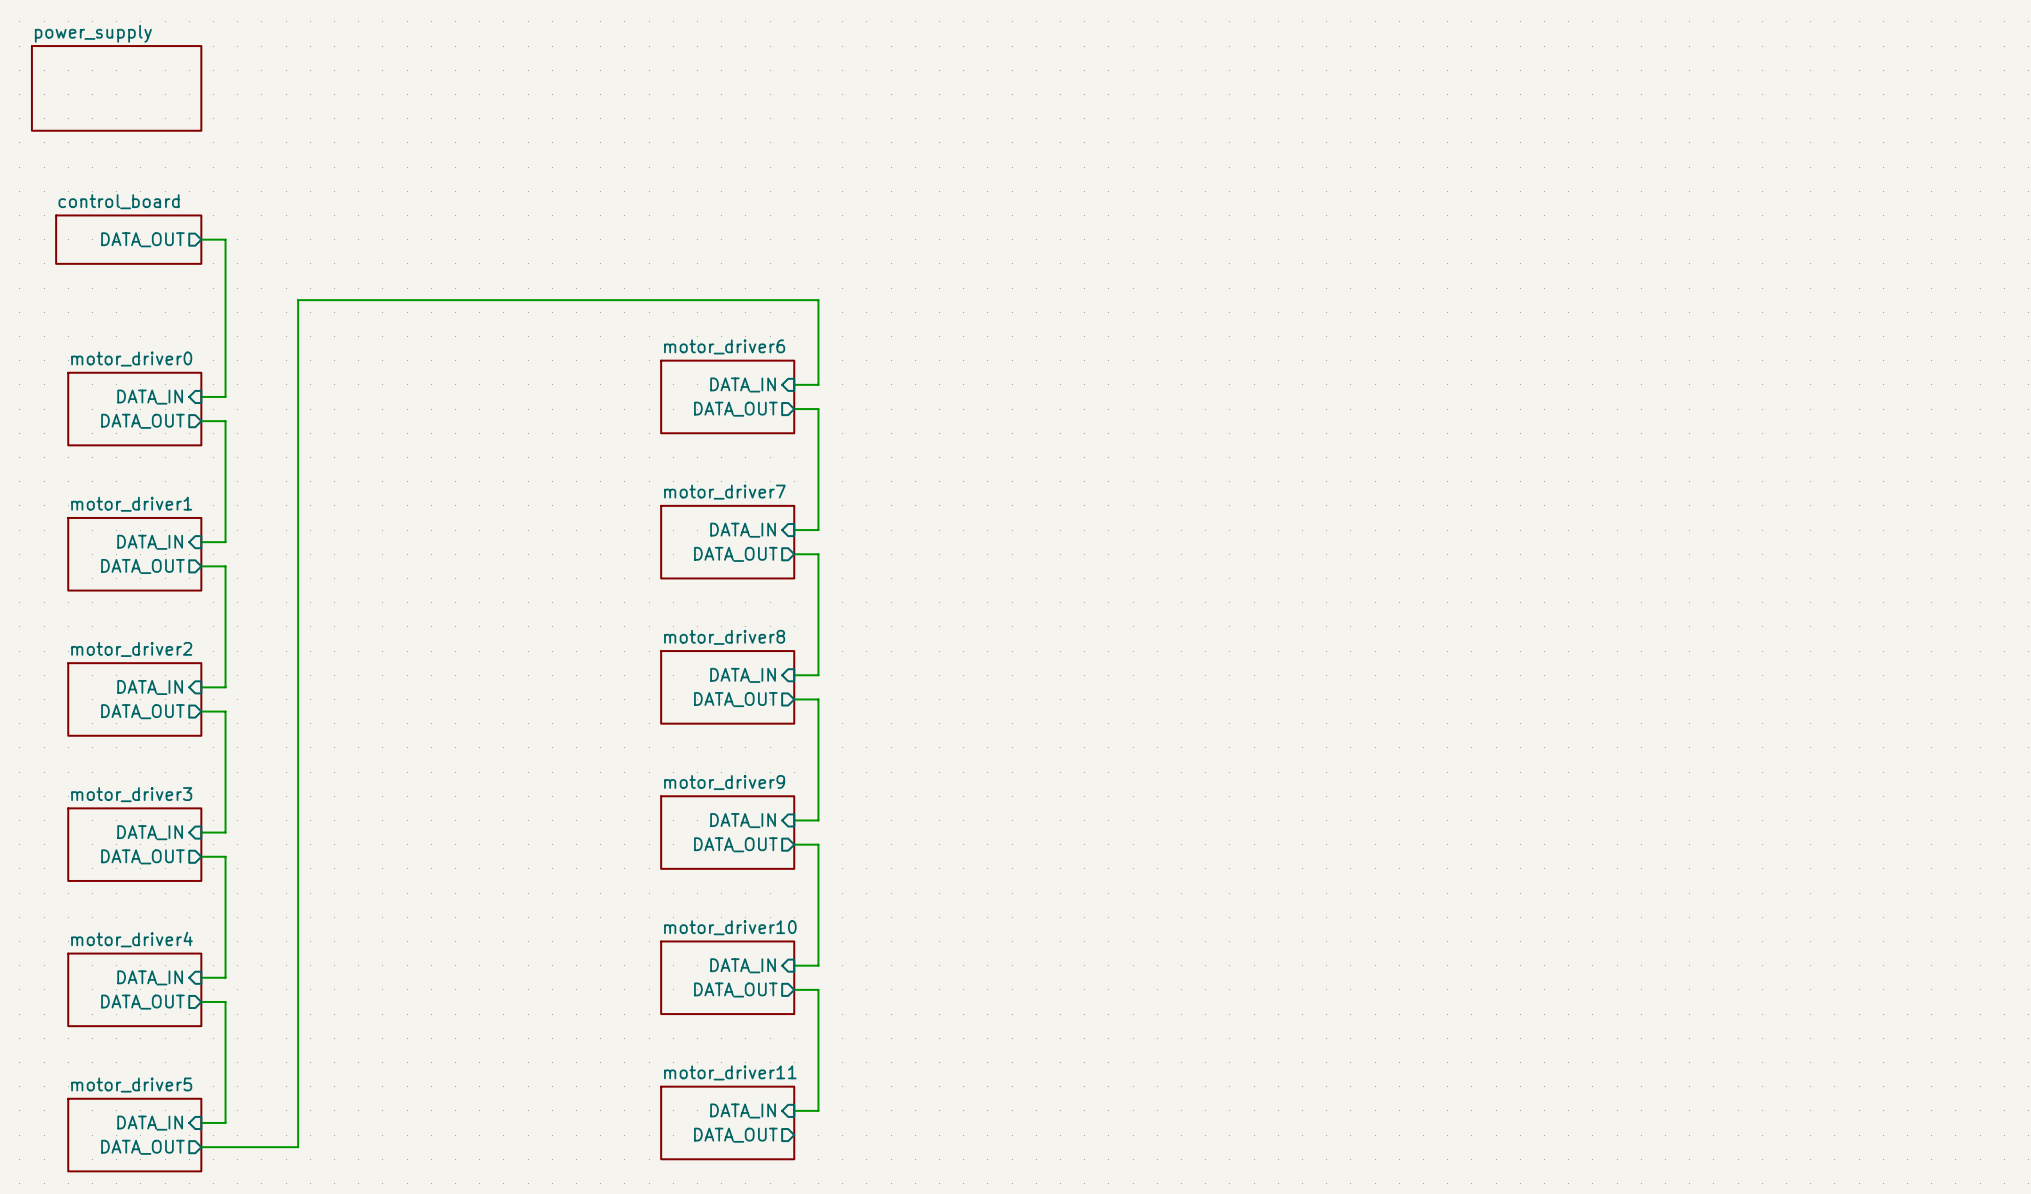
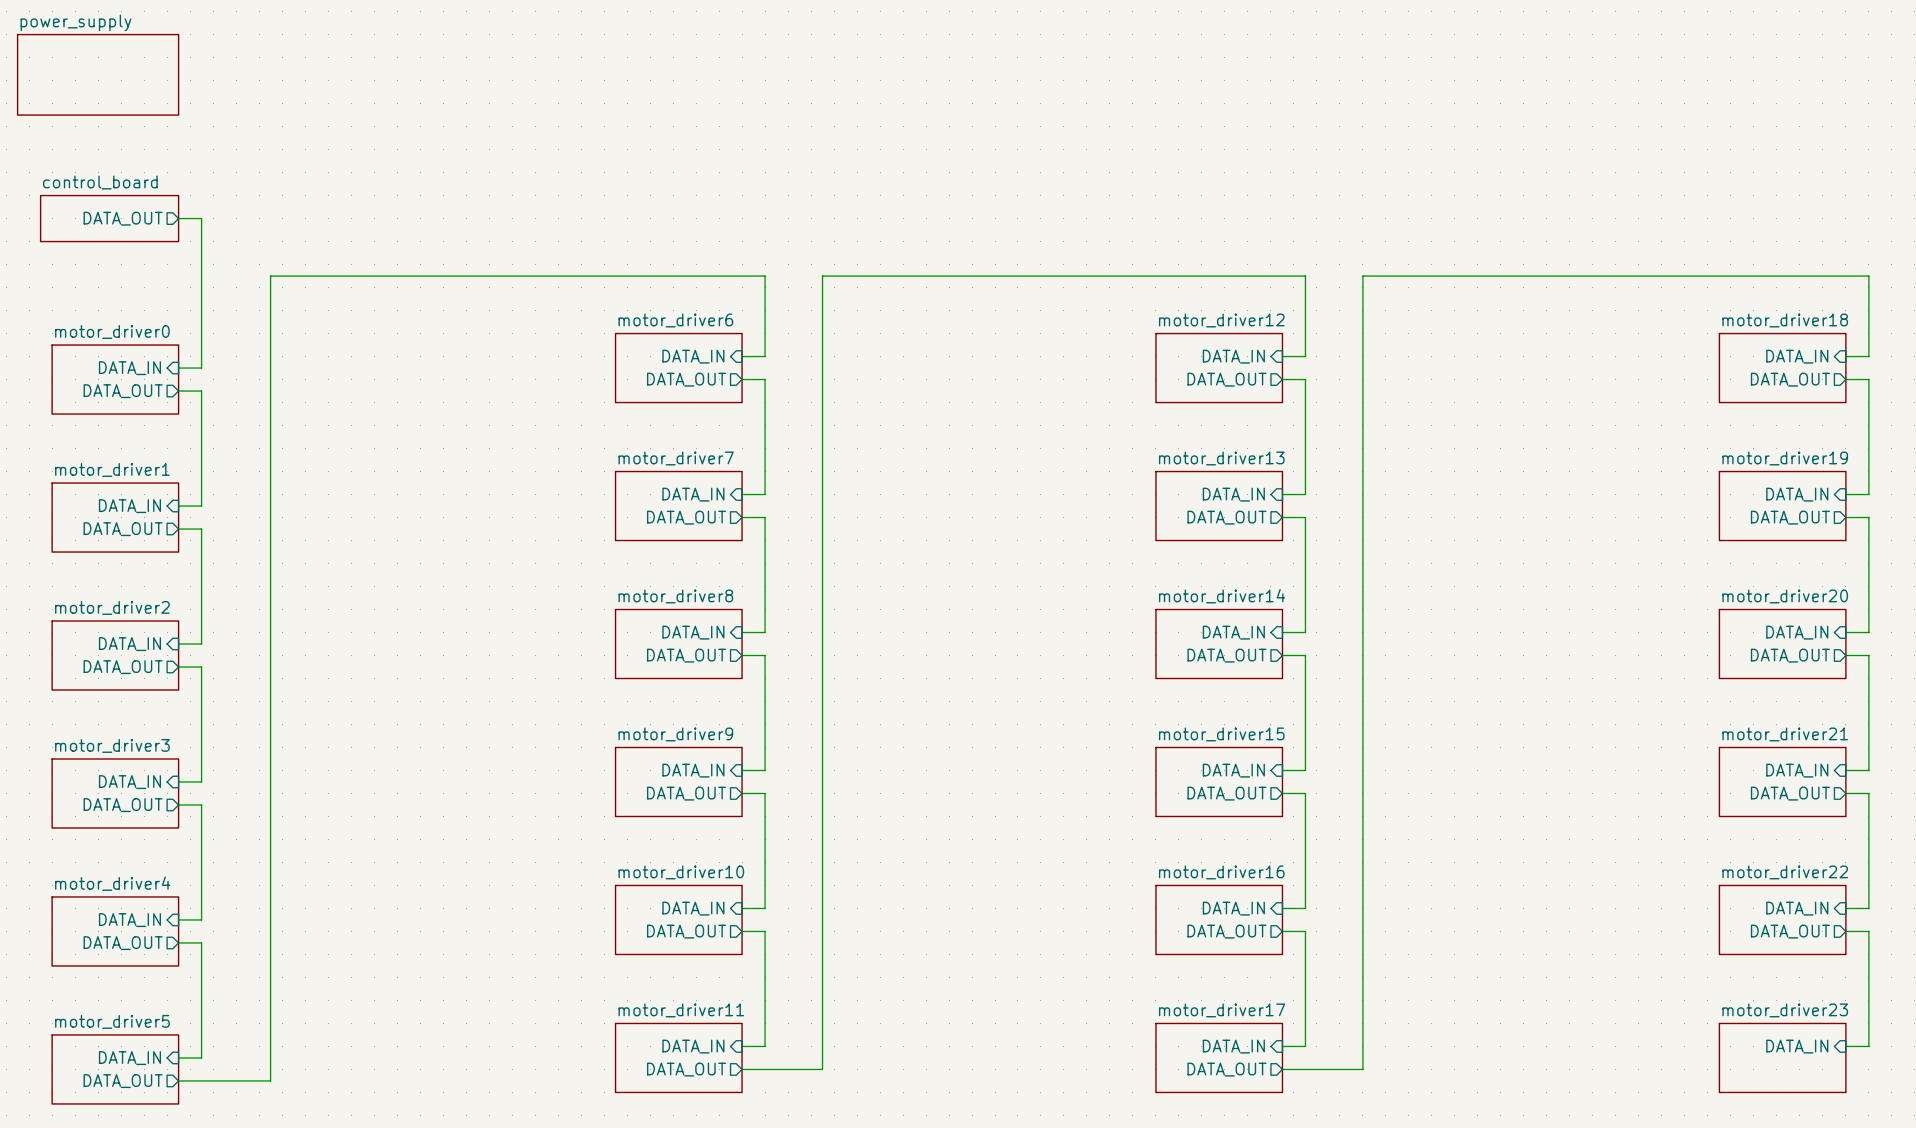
sheet pin: none -> DATA_IN (1233, 356)
wire: none -> (1282, 356) (1305, 356) (1305, 276) (822, 276) (822, 1069) (742, 1069)
sheet pin: none -> DATA_IN (1797, 356)
wire: none -> (1845, 356) (1868, 356) (1868, 276) (1362, 276) (1362, 1069) (1282, 1069)
sheet motor_driver12: none -> (1219, 368)
sheet motor_driver18: none -> (1782, 368)
sheet pin: none -> DATA_OUT (1226, 379)
wire: none -> (1282, 379) (1305, 379) (1305, 494) (1282, 494)
sheet pin: none -> DATA_OUT (1790, 379)
wire: none -> (1845, 379) (1868, 379) (1868, 494) (1845, 494)
sheet pin: none -> DATA_IN (1233, 494)
sheet pin: none -> DATA_IN (1797, 494)
sheet motor_driver13: none -> (1219, 506)
sheet motor_driver19: none -> (1782, 506)
sheet pin: none -> DATA_OUT (1226, 517)
wire: none -> (1282, 517) (1305, 517) (1305, 632) (1282, 632)
sheet pin: none -> DATA_OUT (1790, 517)
wire: none -> (1845, 517) (1868, 517) (1868, 632) (1845, 632)
sheet pin: none -> DATA_IN (1233, 632)
sheet pin: none -> DATA_IN (1797, 632)
sheet motor_driver14: none -> (1219, 644)
sheet motor_driver20: none -> (1782, 644)
sheet pin: none -> DATA_OUT (1226, 655)
wire: none -> (1282, 655) (1305, 655) (1305, 770) (1282, 770)
sheet pin: none -> DATA_OUT (1790, 655)
wire: none -> (1845, 655) (1868, 655) (1868, 770) (1845, 770)
sheet pin: none -> DATA_IN (1233, 770)
sheet pin: none -> DATA_IN (1797, 770)
sheet motor_driver15: none -> (1219, 781)
sheet motor_driver21: none -> (1782, 781)
sheet pin: none -> DATA_OUT (1226, 793)
wire: none -> (1282, 793) (1305, 793) (1305, 908) (1282, 908)
sheet pin: none -> DATA_OUT (1790, 793)
wire: none -> (1845, 793) (1868, 793) (1868, 908) (1845, 908)
sheet pin: none -> DATA_IN (1233, 908)
sheet pin: none -> DATA_IN (1797, 908)
sheet motor_driver16: none -> (1219, 919)
sheet motor_driver22: none -> (1782, 919)
sheet pin: none -> DATA_OUT (1226, 931)
wire: none -> (1282, 931) (1305, 931) (1305, 1046) (1282, 1046)
sheet pin: none -> DATA_OUT (1790, 931)
wire: none -> (1845, 931) (1868, 931) (1868, 1046) (1845, 1046)
sheet pin: none -> DATA_IN (1233, 1046)
sheet pin: none -> DATA_IN (1797, 1046)
sheet motor_driver17: none -> (1219, 1057)
sheet motor_driver23: none -> (1782, 1057)
sheet pin: none -> DATA_OUT (1226, 1069)

